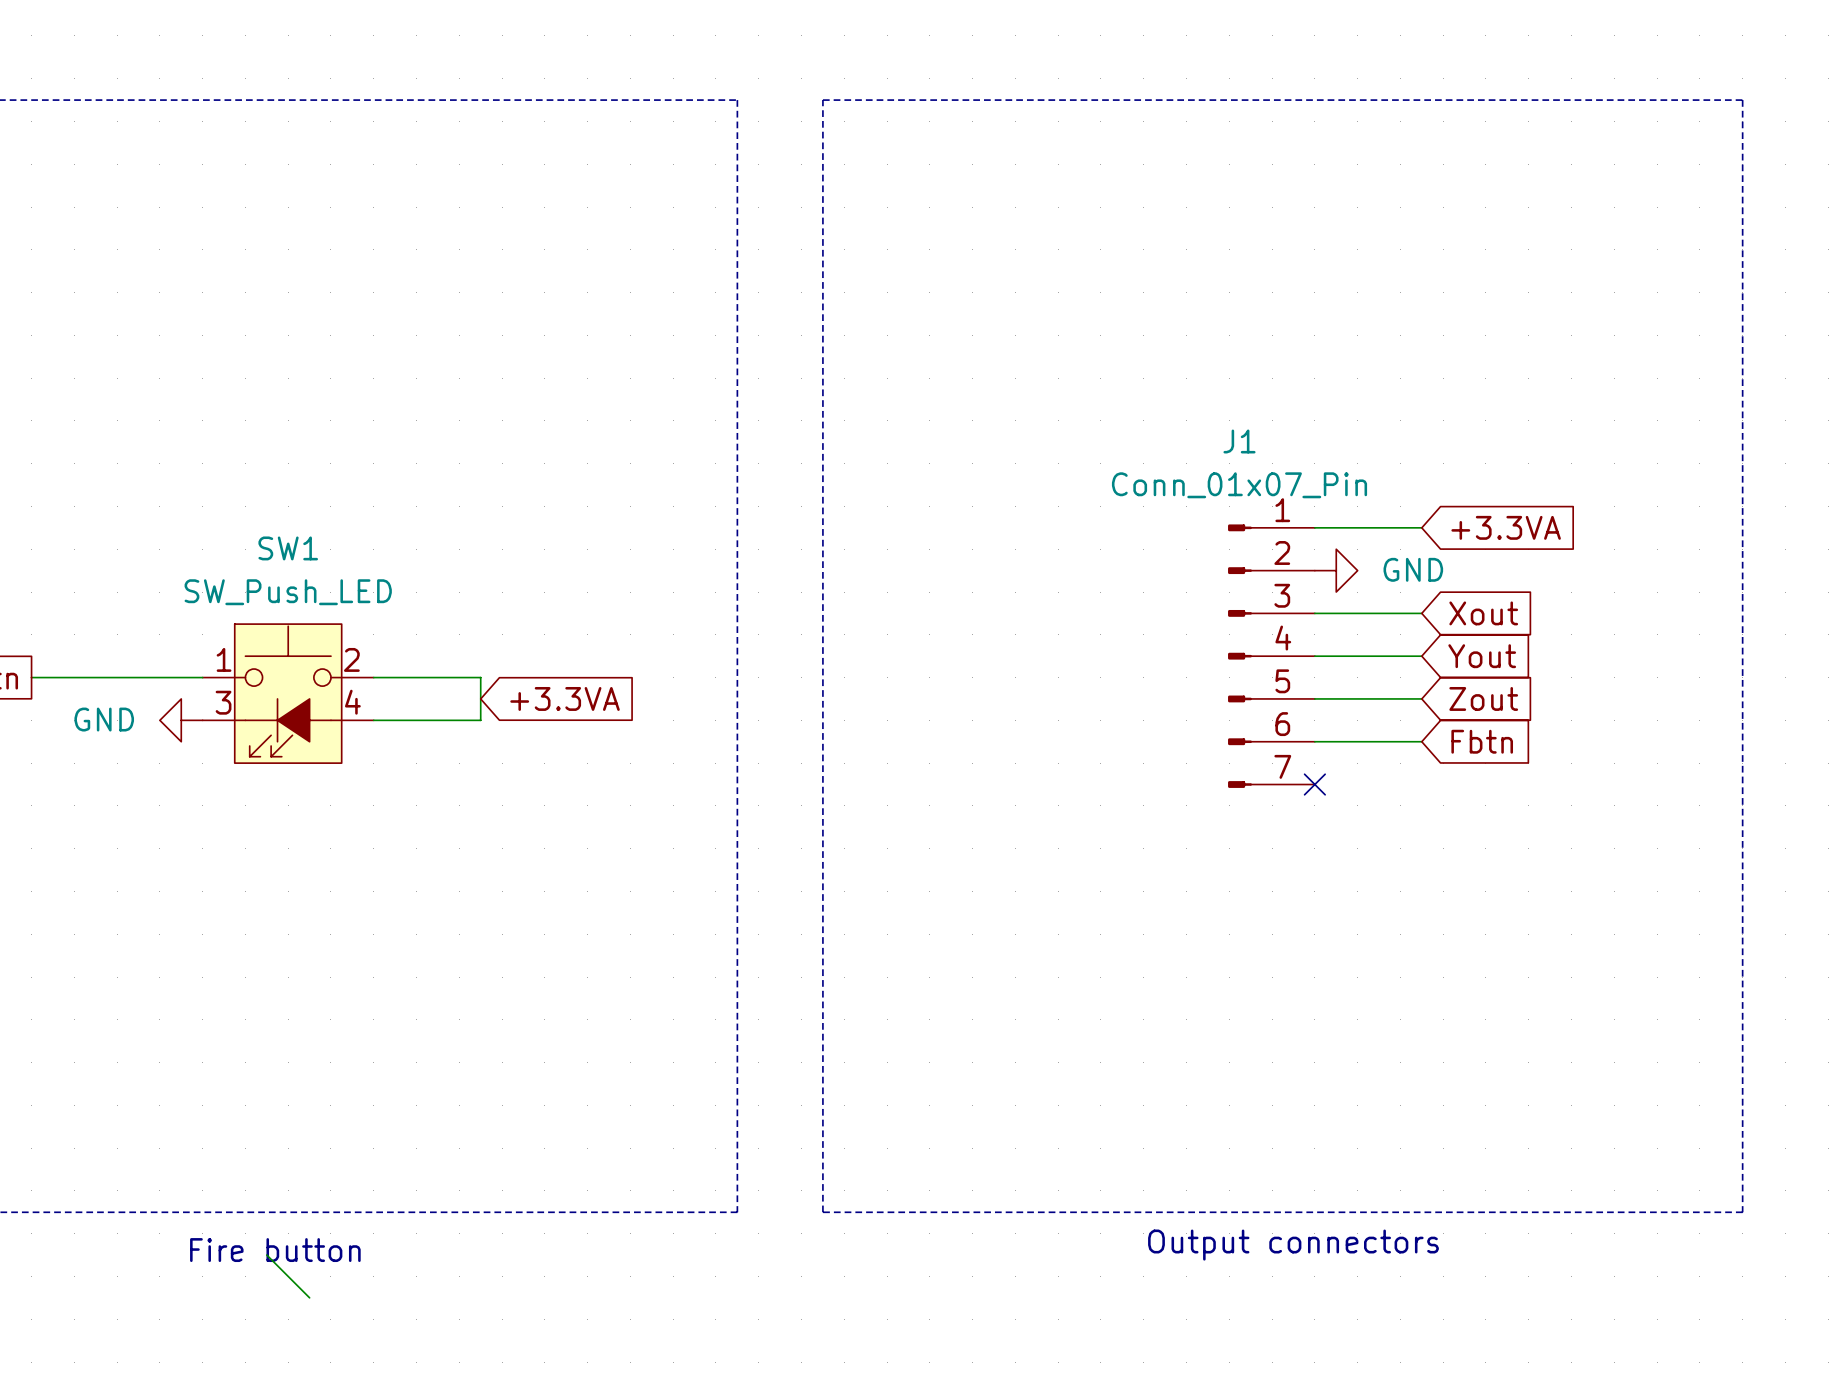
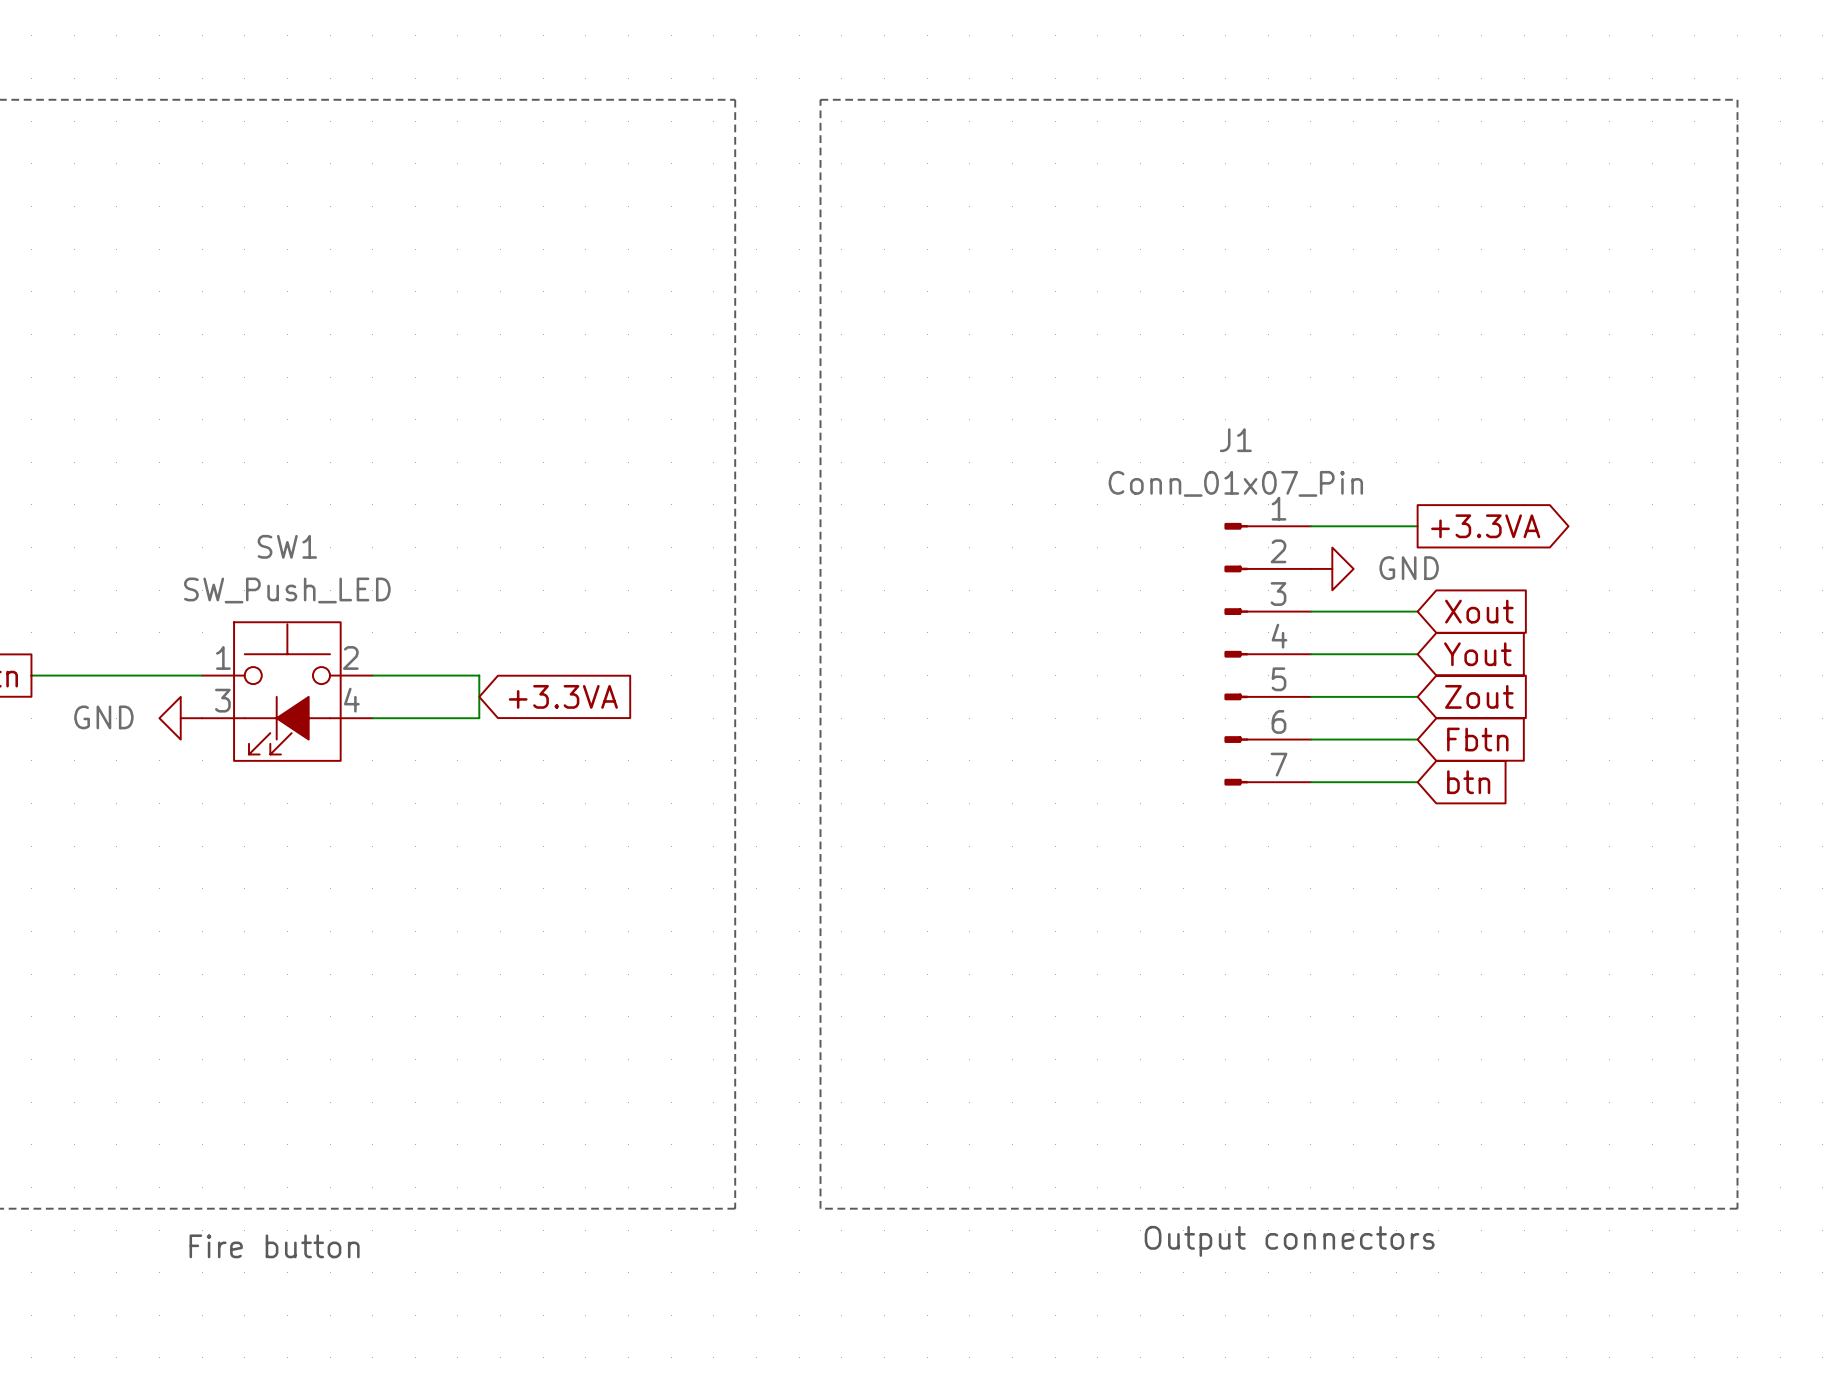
global label shape: input (1506, 527) -> output (1485, 526)
wire: none -> (1310, 782) (1417, 782)
no-connect mark: (1314, 784) -> none
global label: none -> btn (1468, 782)
wire: (266, 1255) (309, 1297) -> none

